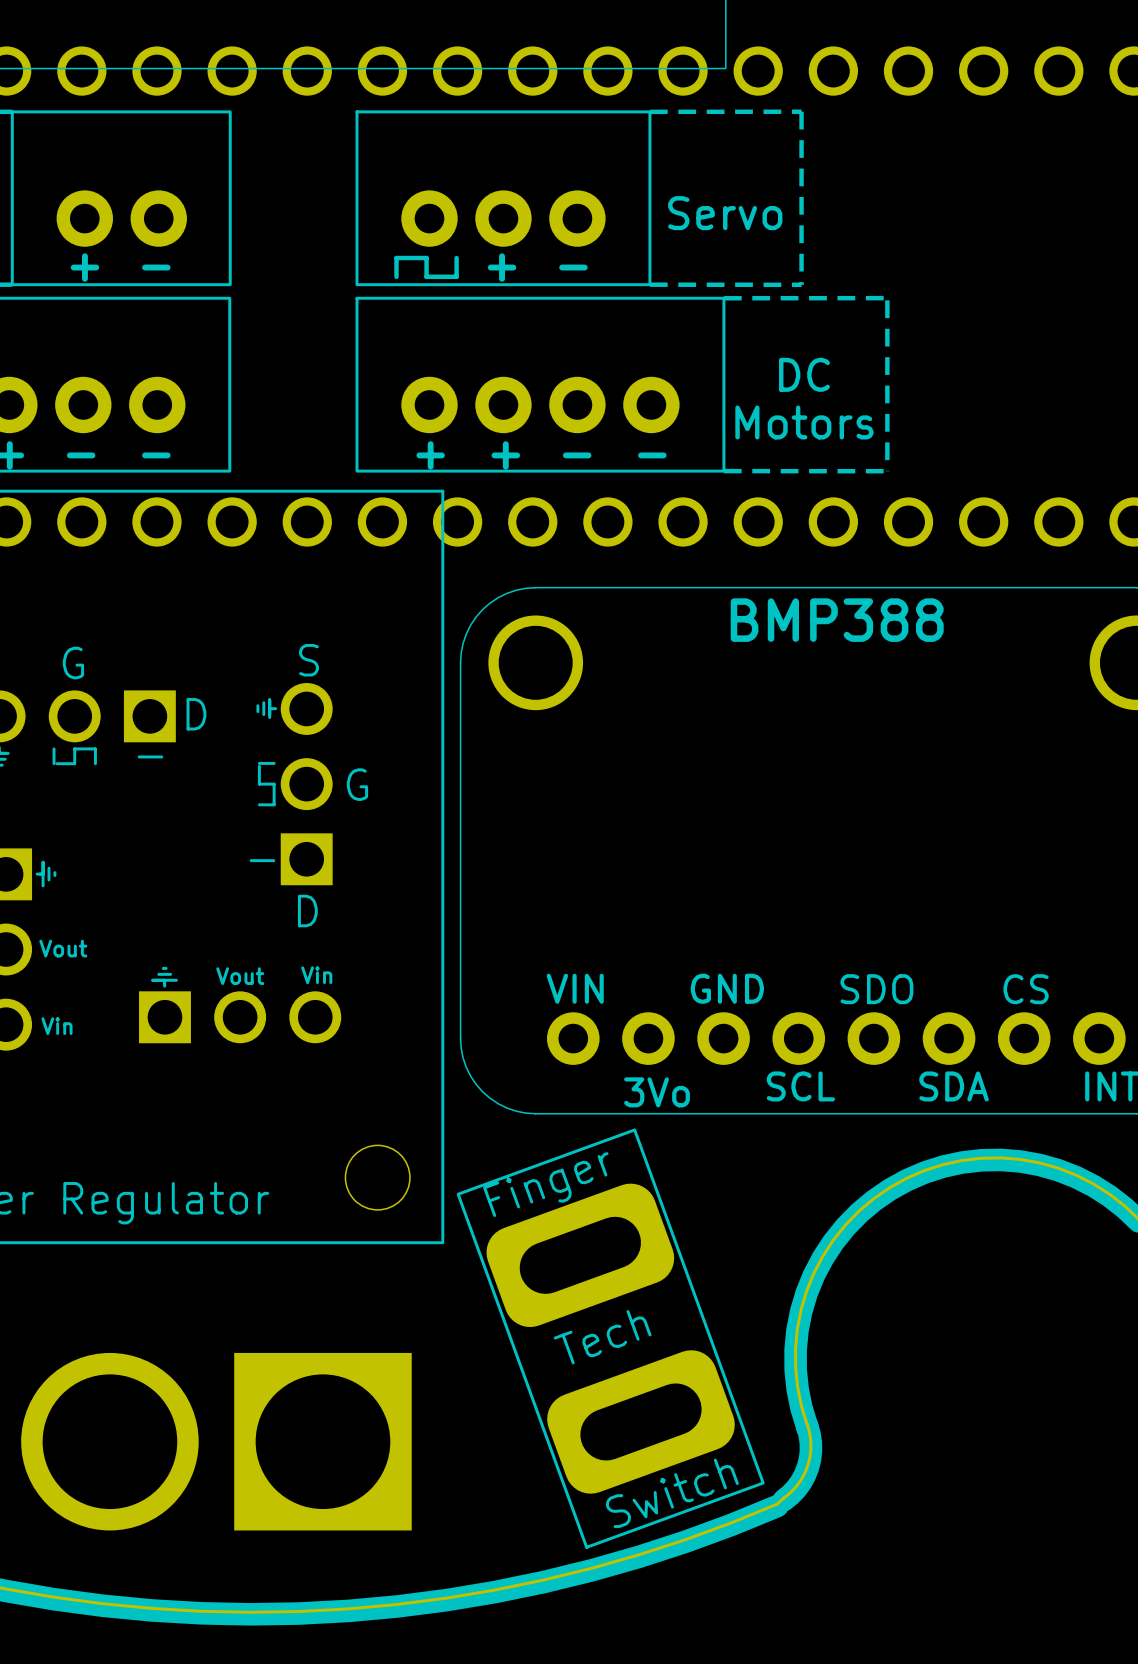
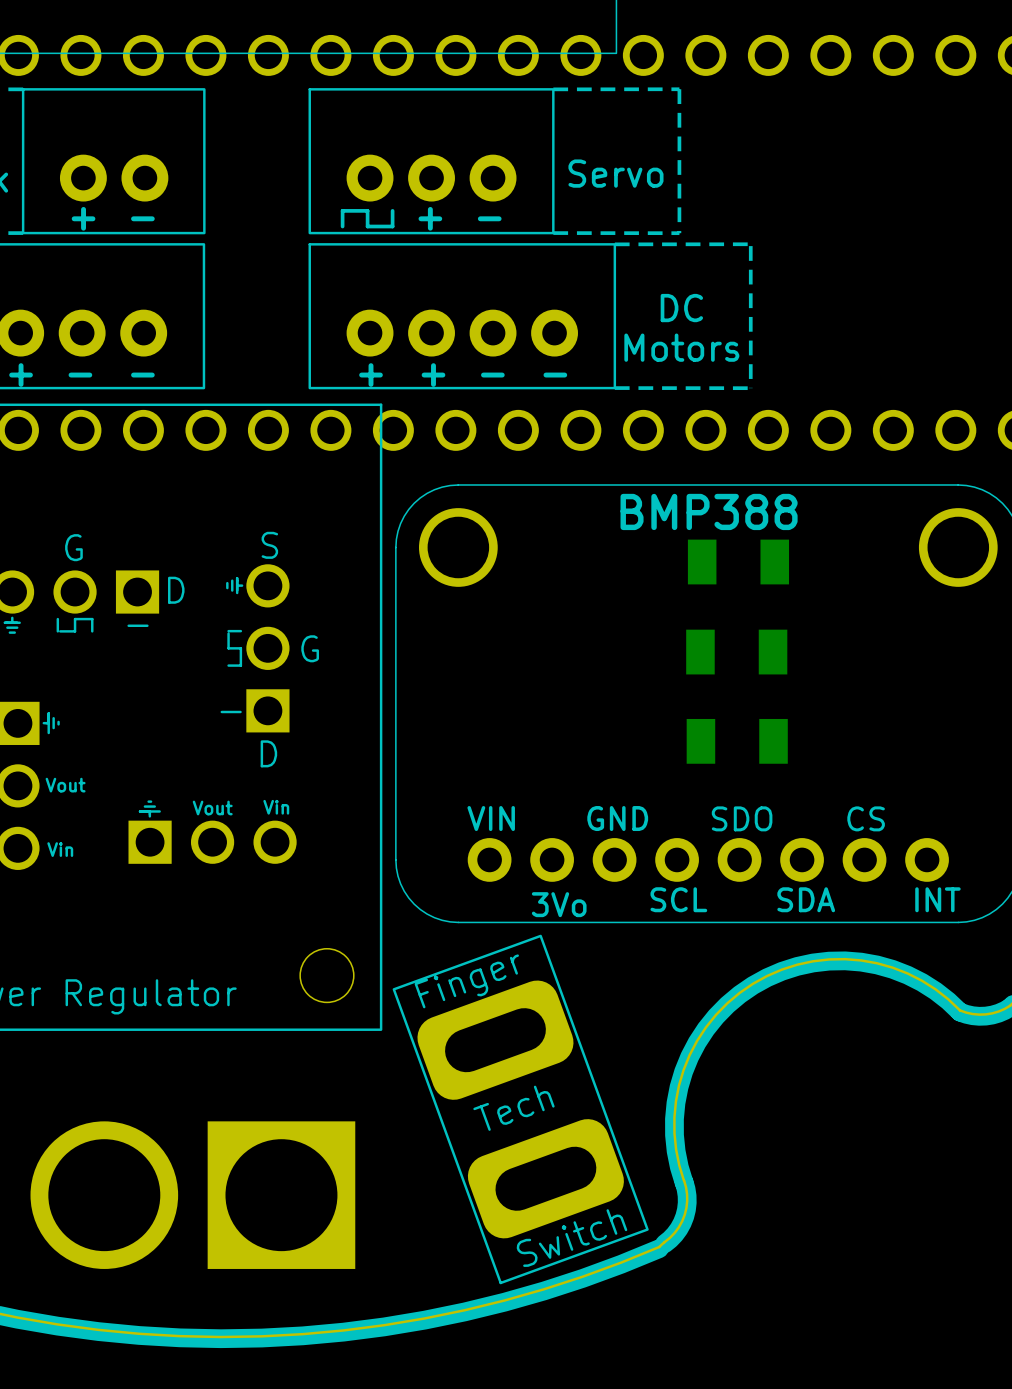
part: none -> (738, 562)
part: none -> (736, 652)
part: none -> (737, 741)

